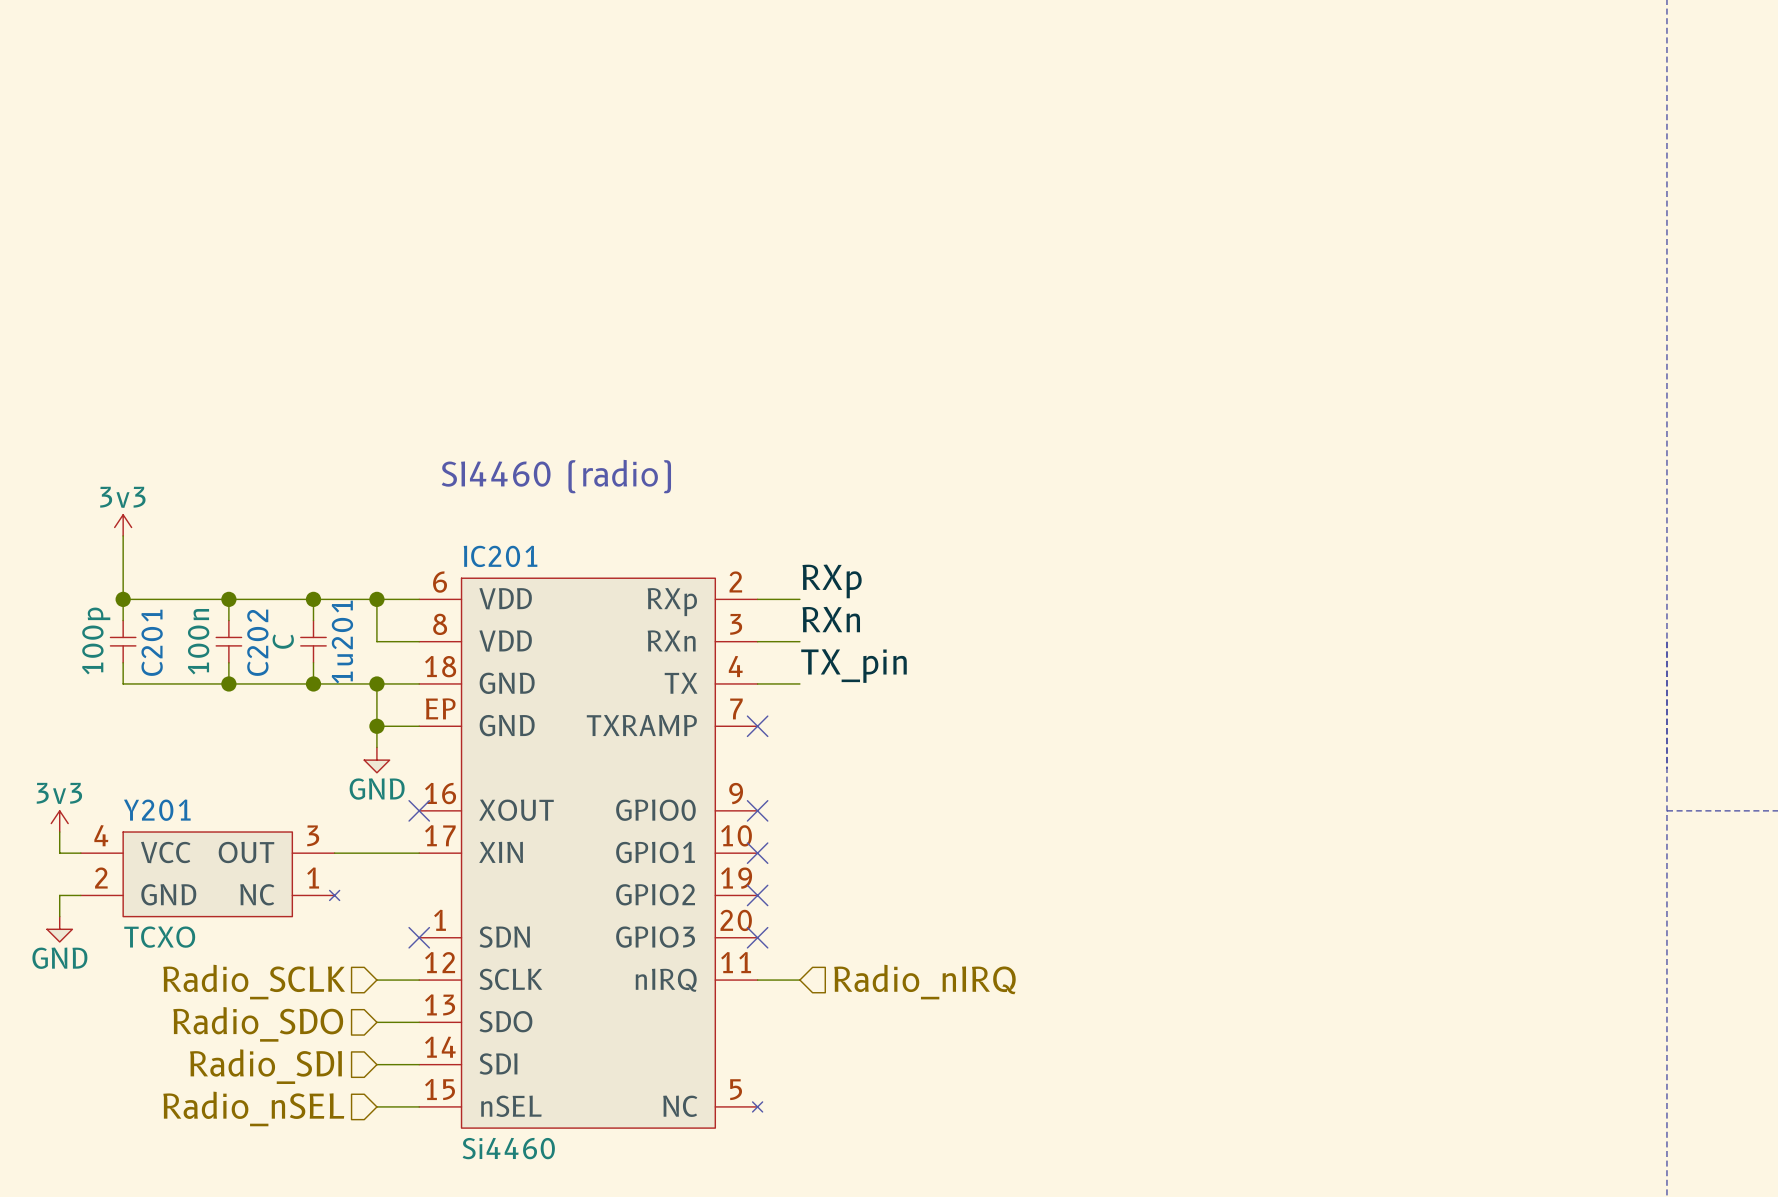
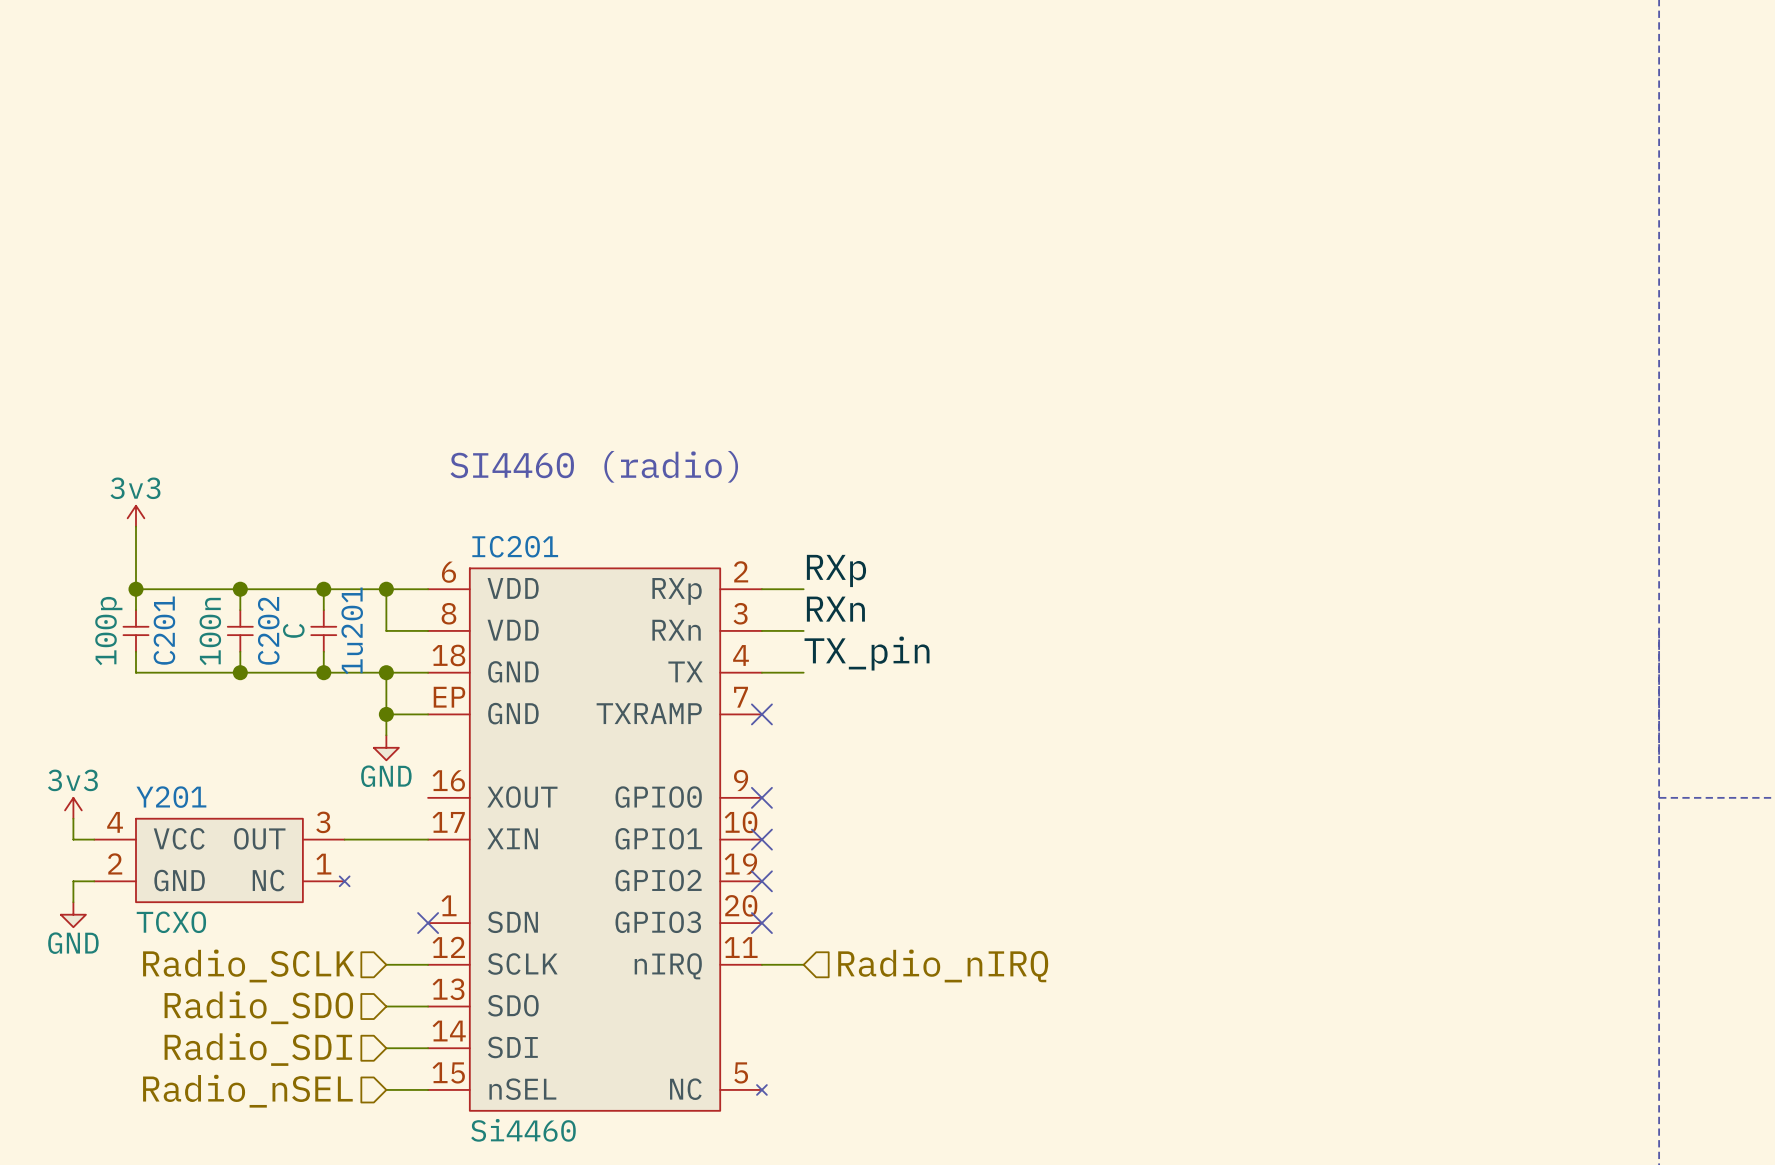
no-connect mark: (419, 810) -> none

